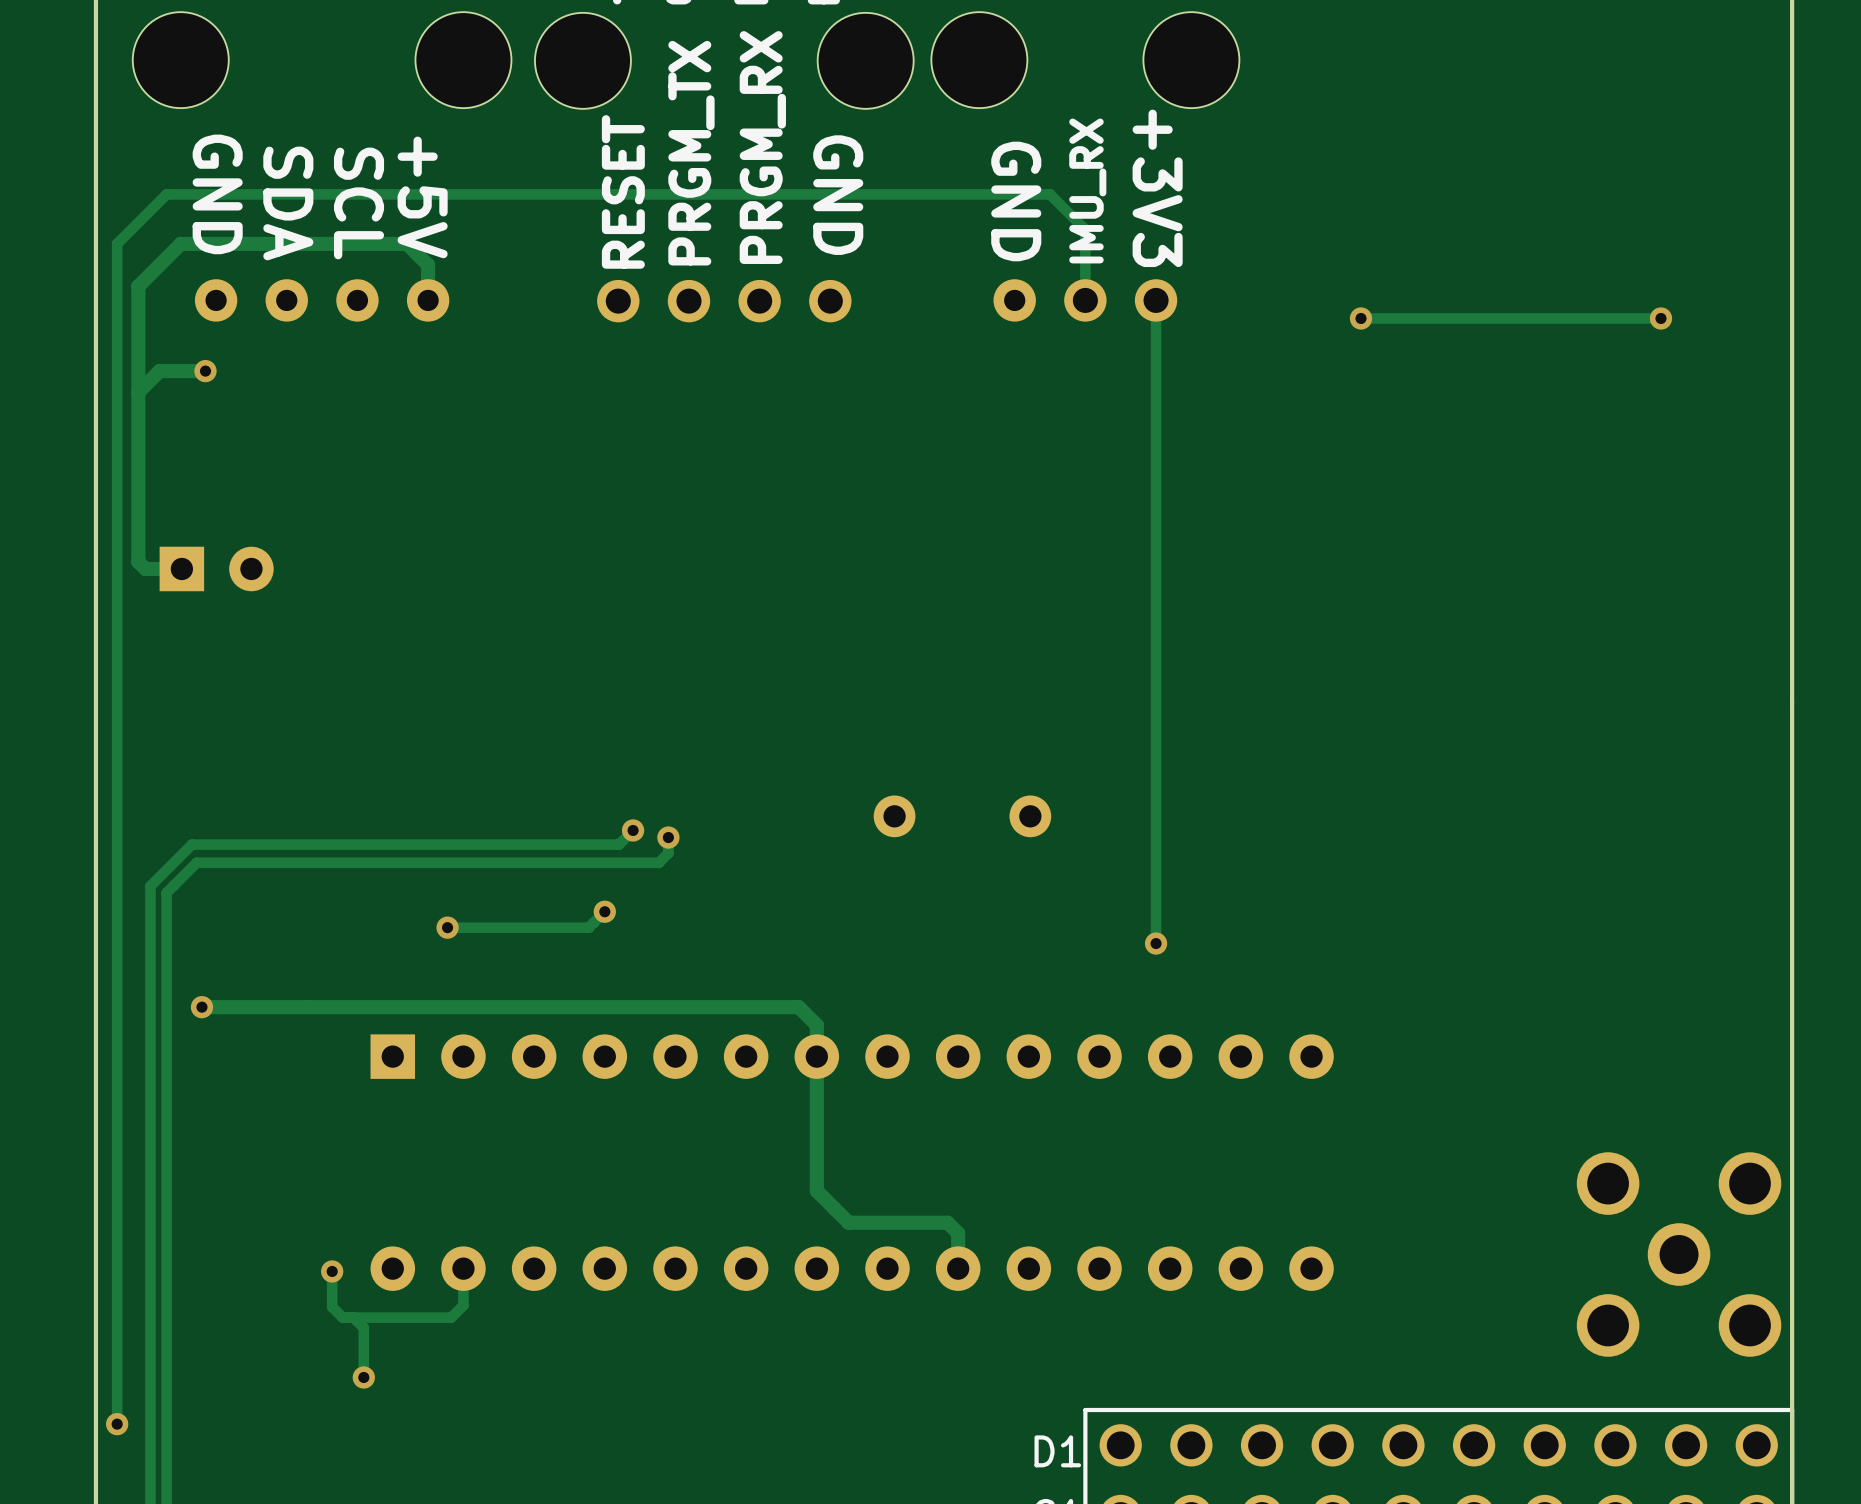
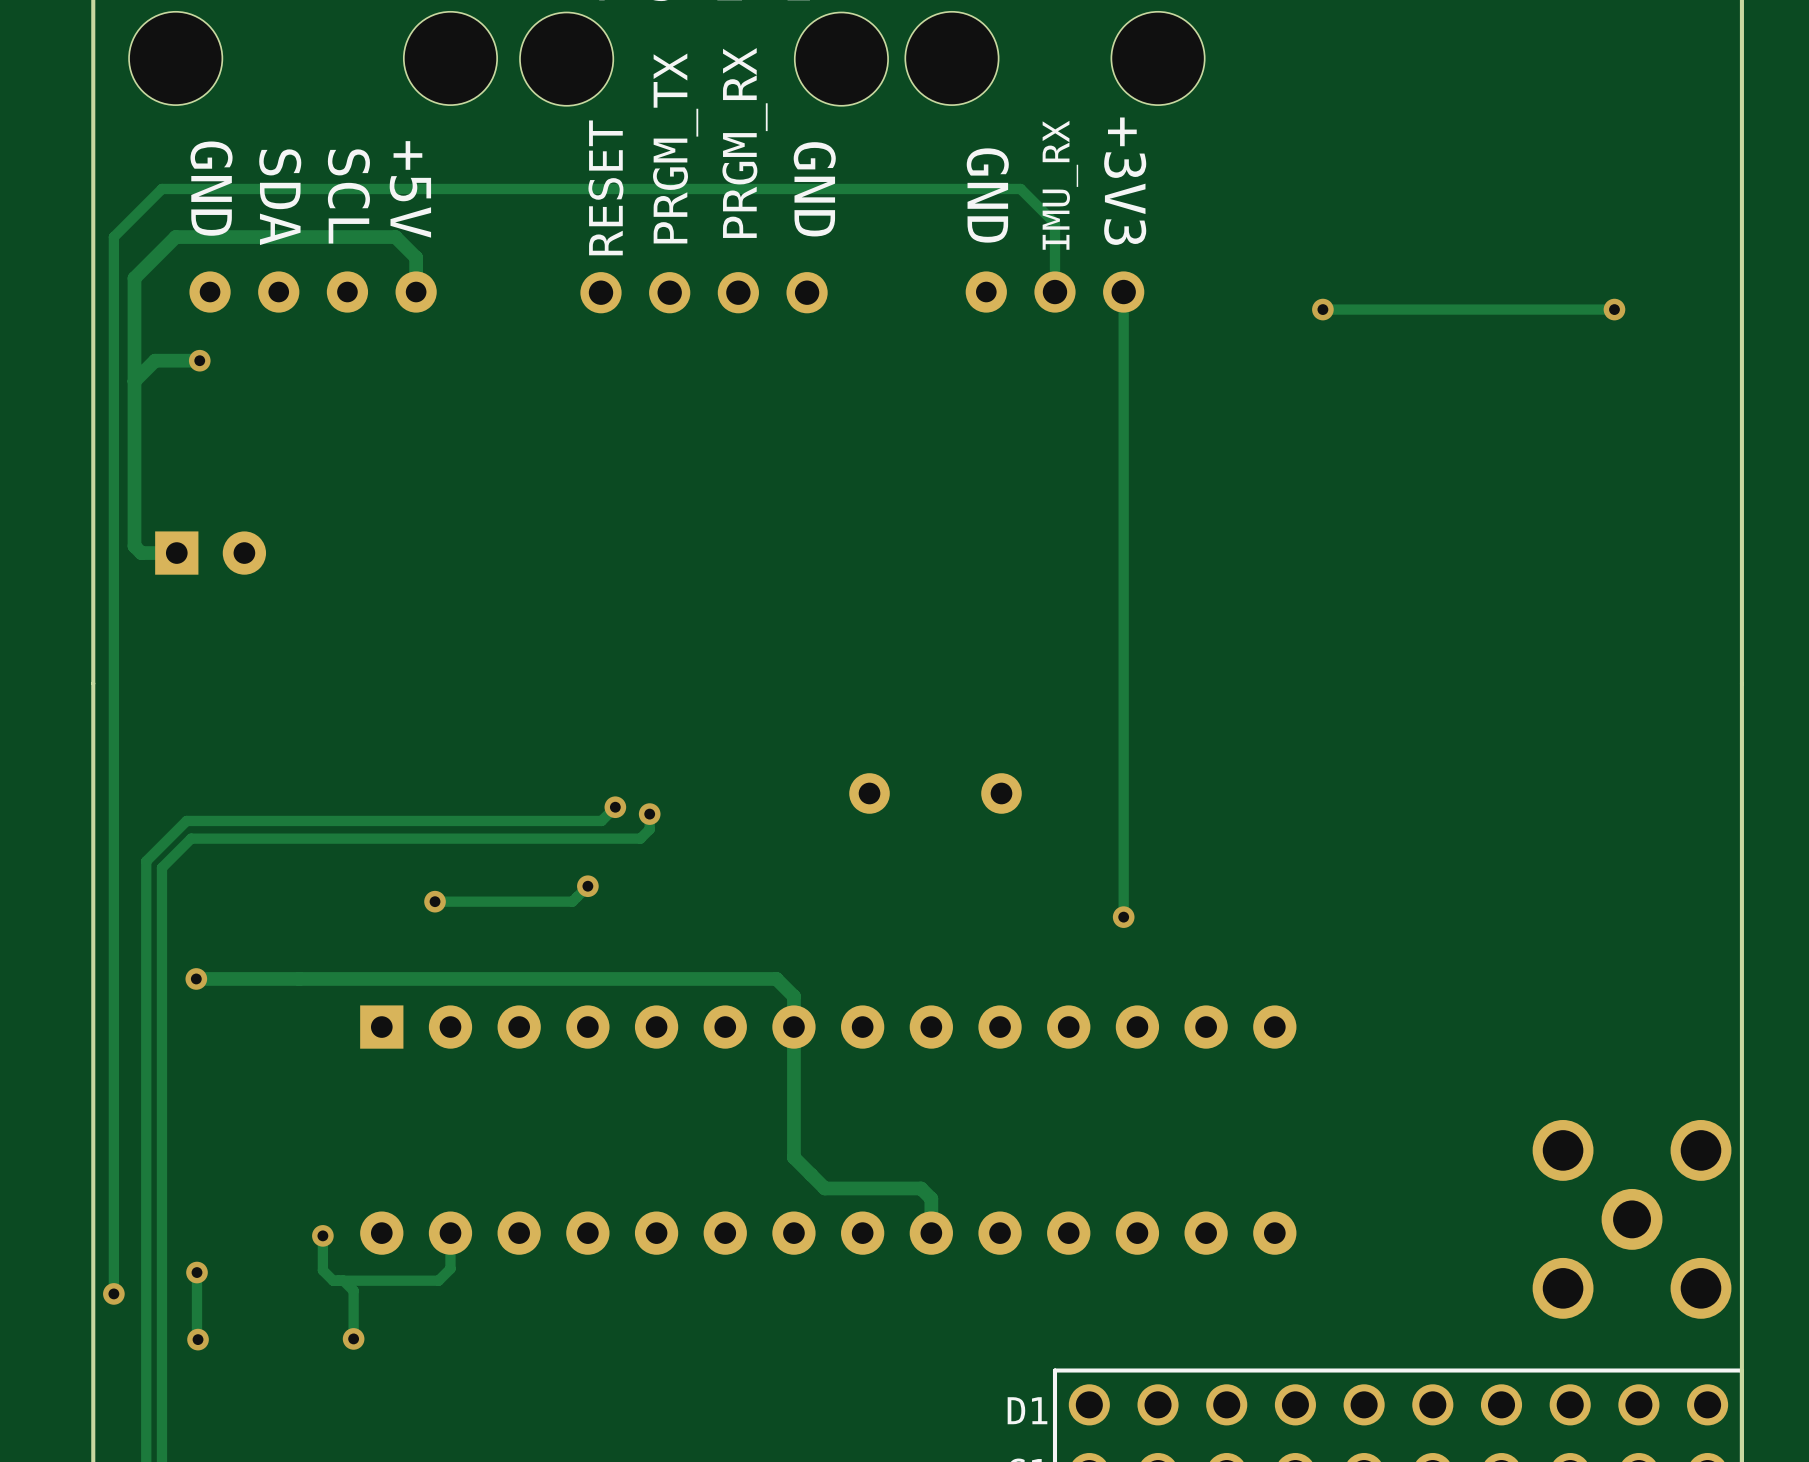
track: none -> (197, 1272) (198, 1339)
via: none -> (197, 1272)
track: (117, 1331) (117, 1424) -> none
via: none -> (113, 1293)
via: none -> (198, 1339)
via: (117, 1424) -> none

